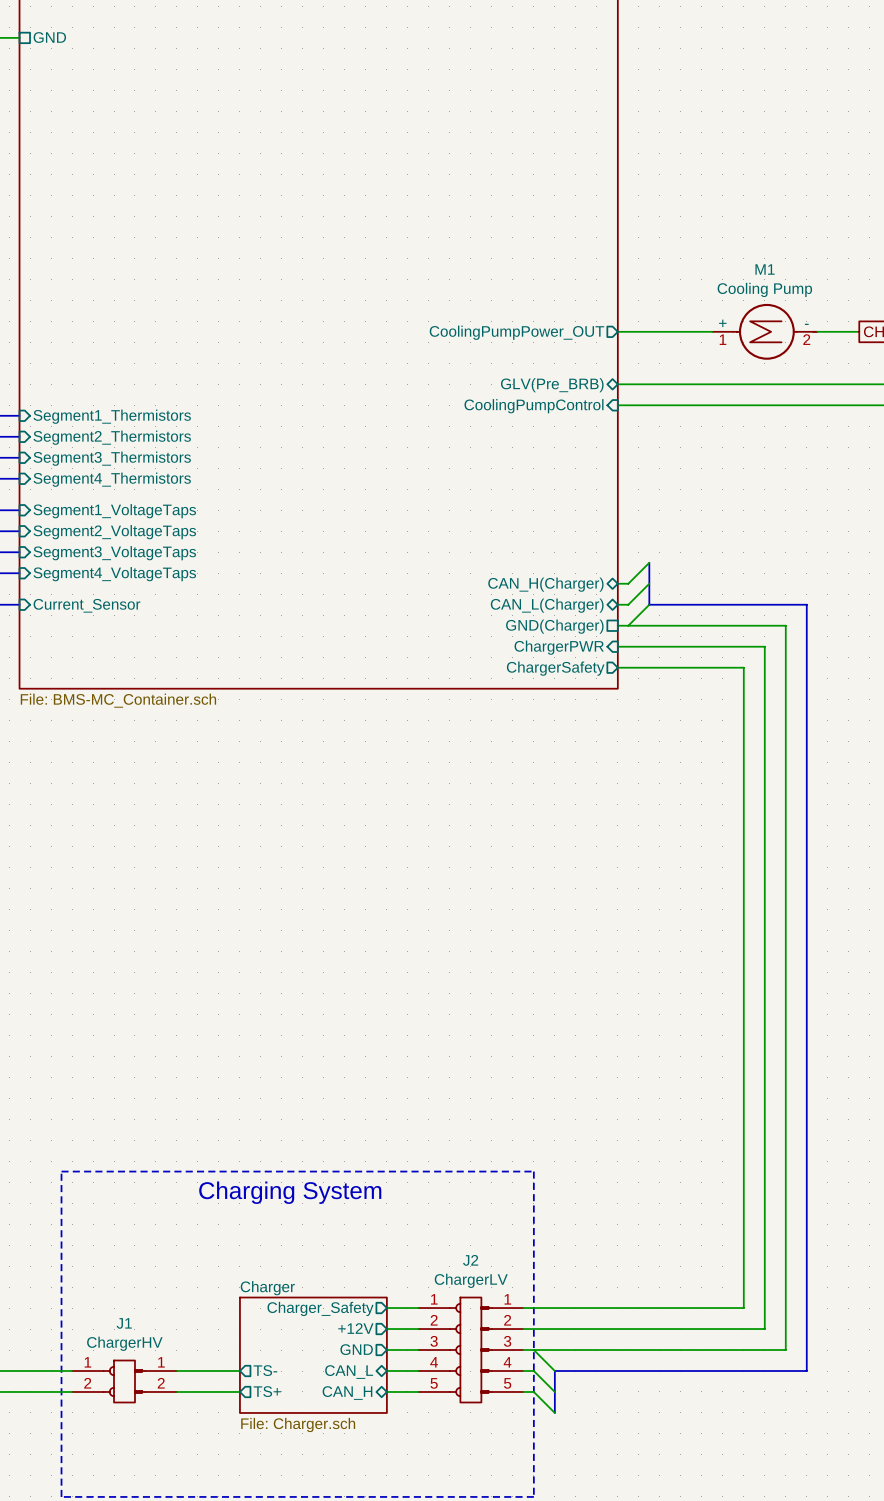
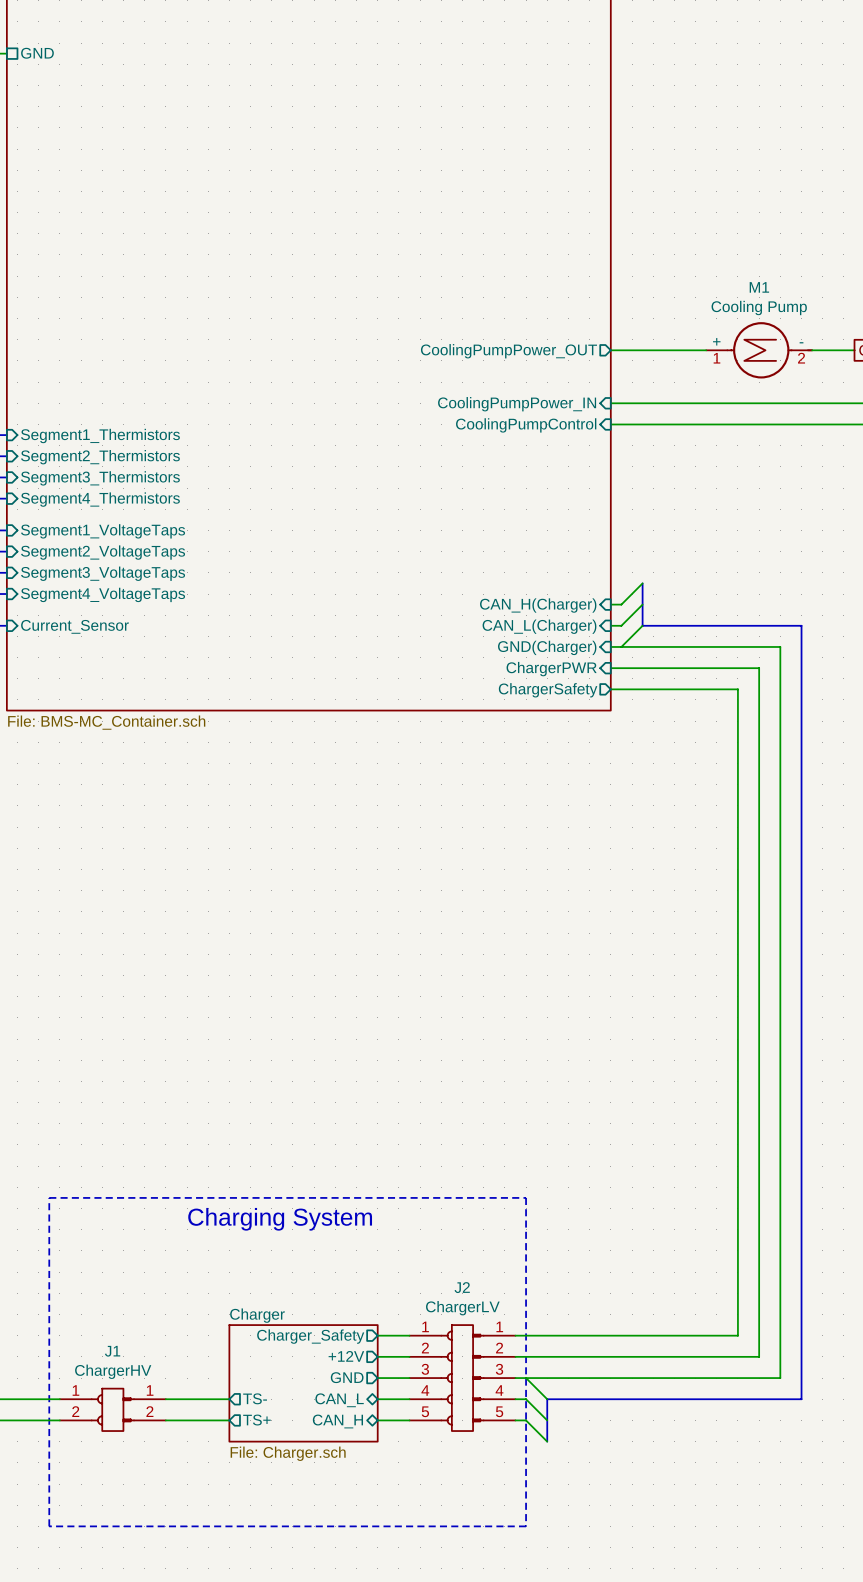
sheet pin shape: bidirectional (552, 385) -> input (517, 404)
sheet pin: GLV(Pre_BRB) (552, 385) -> CoolingPumpPower_IN (517, 404)
sheet pin shape: bidirectional (545, 584) -> input (538, 605)
sheet pin shape: bidirectional (547, 605) -> input (539, 626)
sheet pin shape: passive (554, 626) -> input (547, 647)

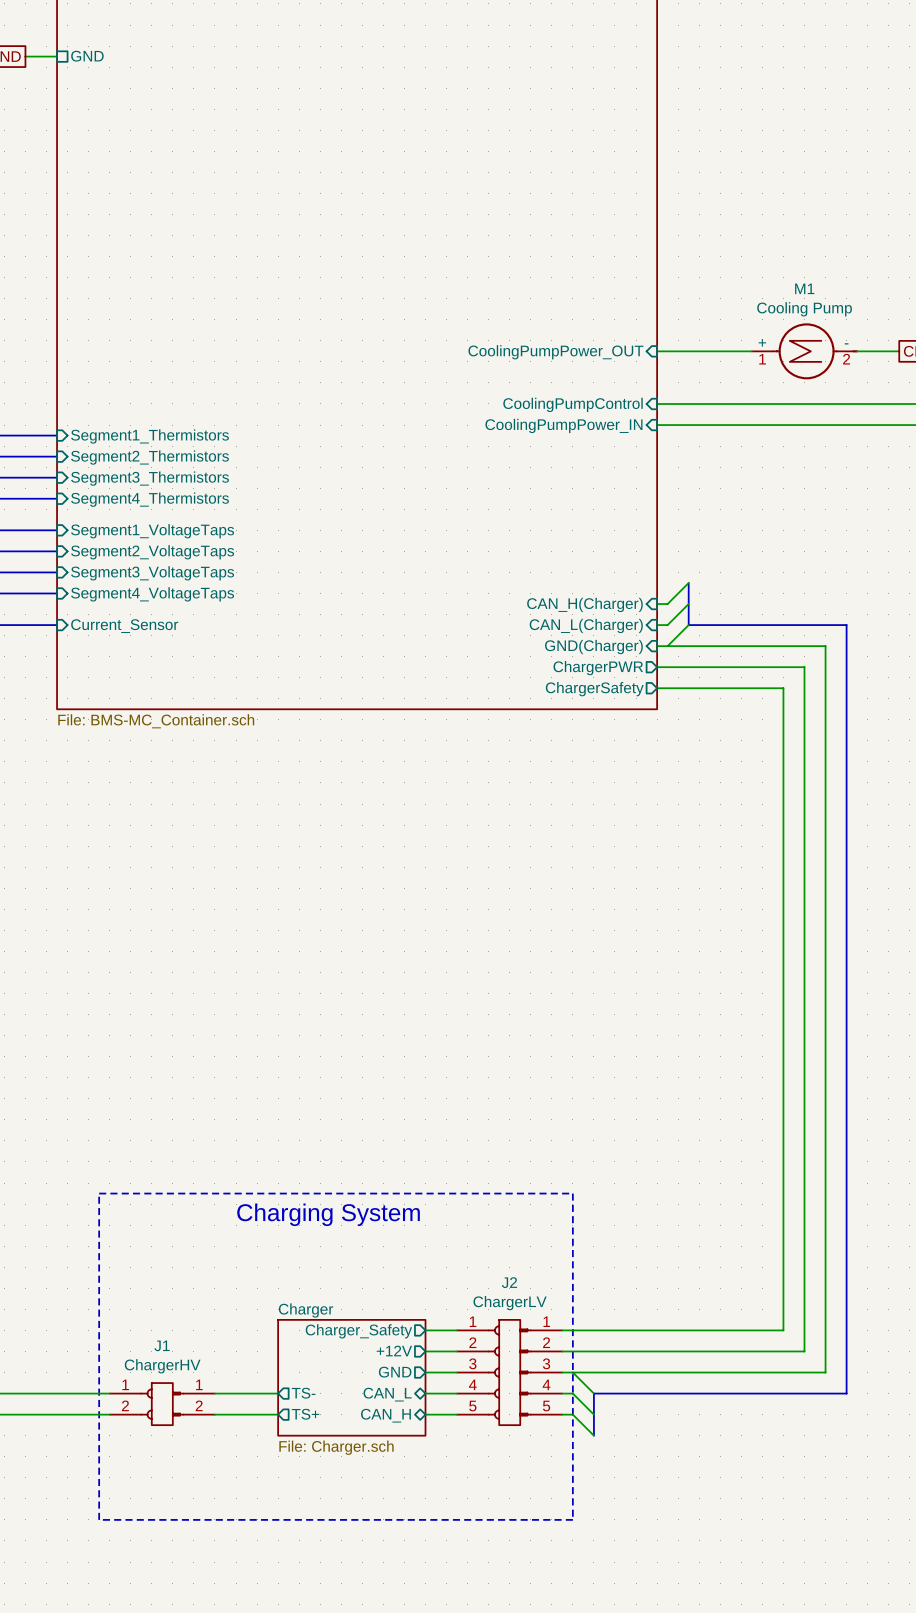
sheet pin shape: output (508, 351) -> input (555, 352)
sheet pin: CoolingPumpPower_IN (517, 404) -> CoolingPumpControl (573, 404)
sheet pin: CoolingPumpControl (526, 425) -> CoolingPumpPower_IN (563, 425)
sheet pin shape: input (551, 669) -> output (598, 668)

